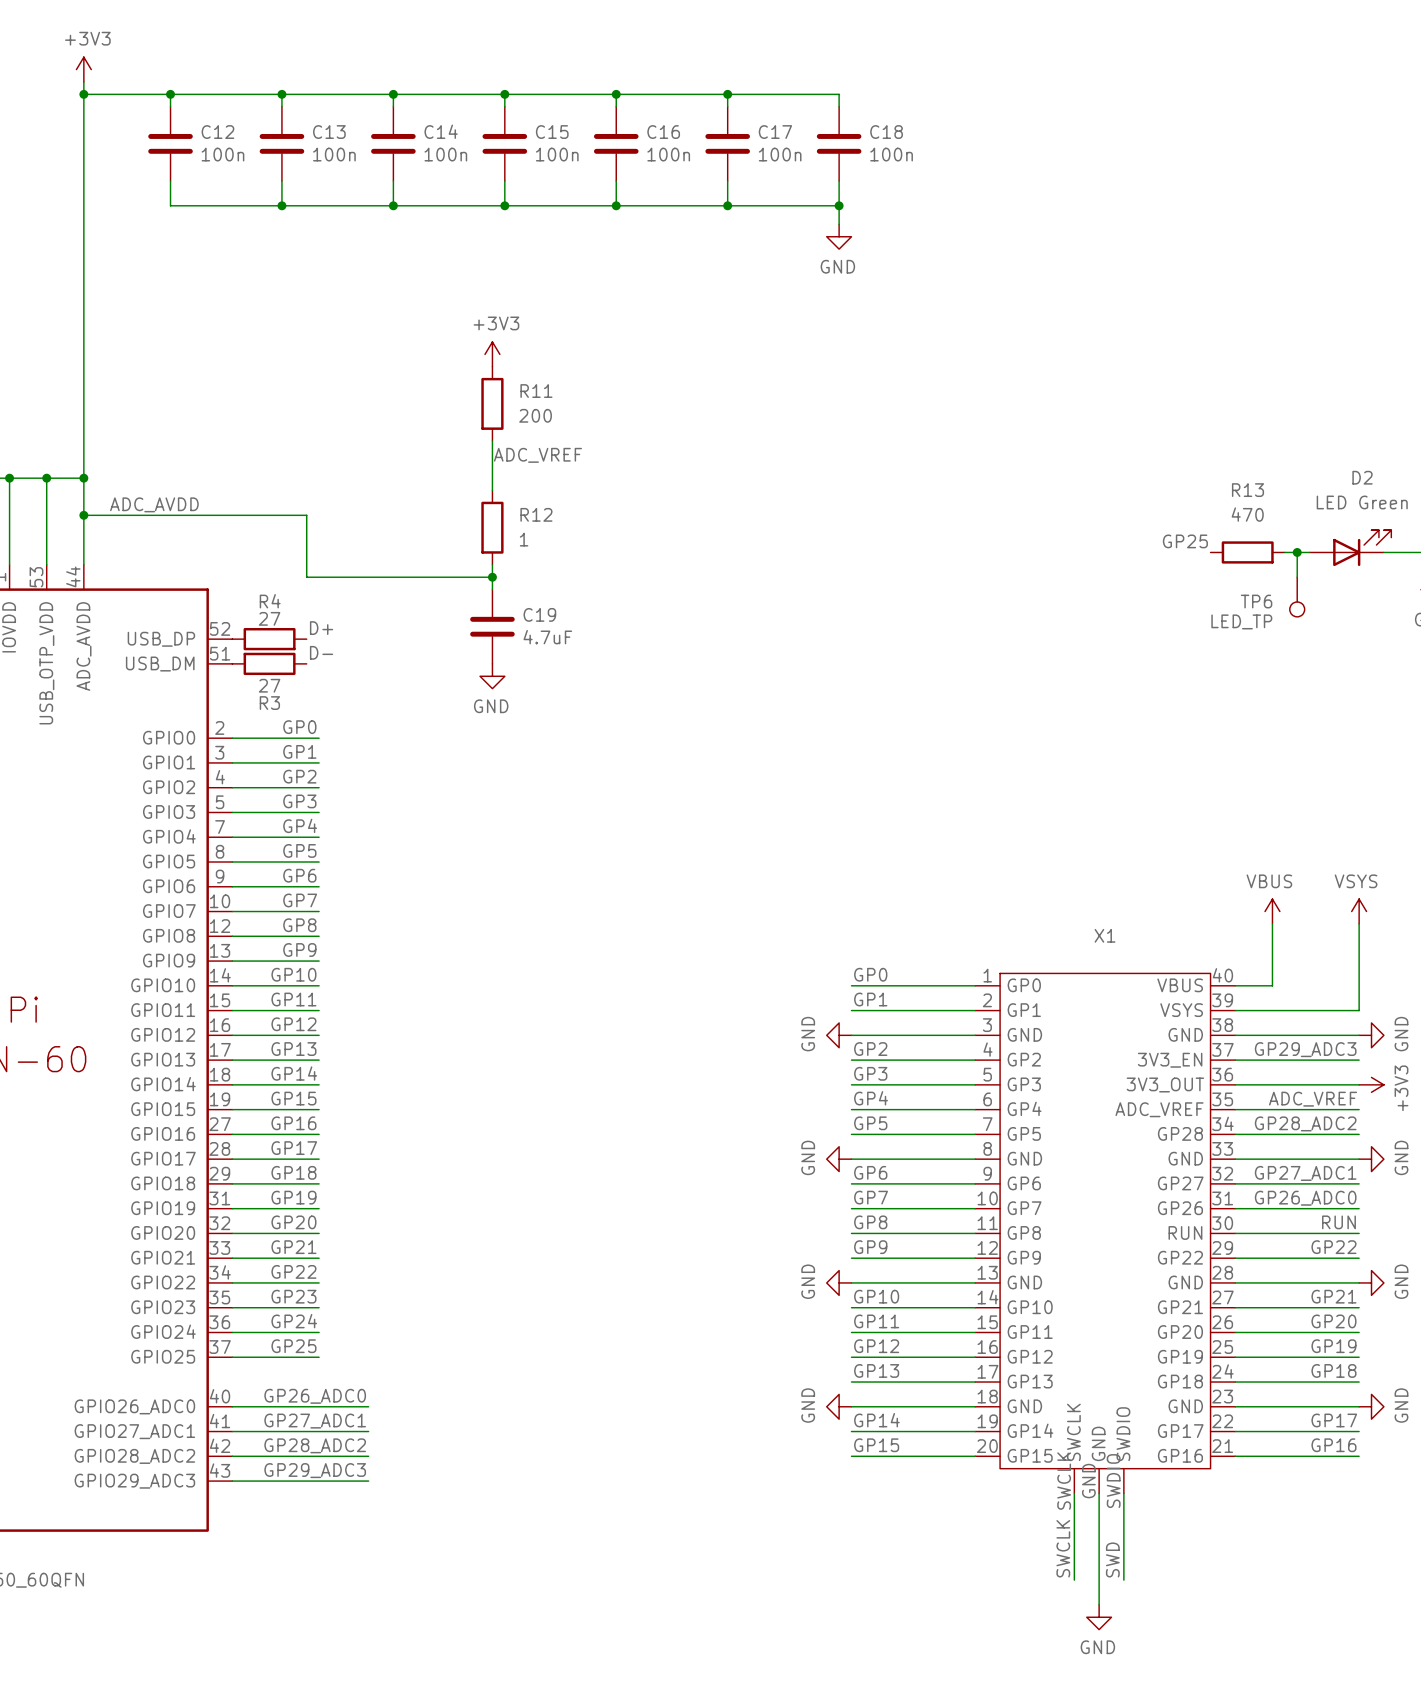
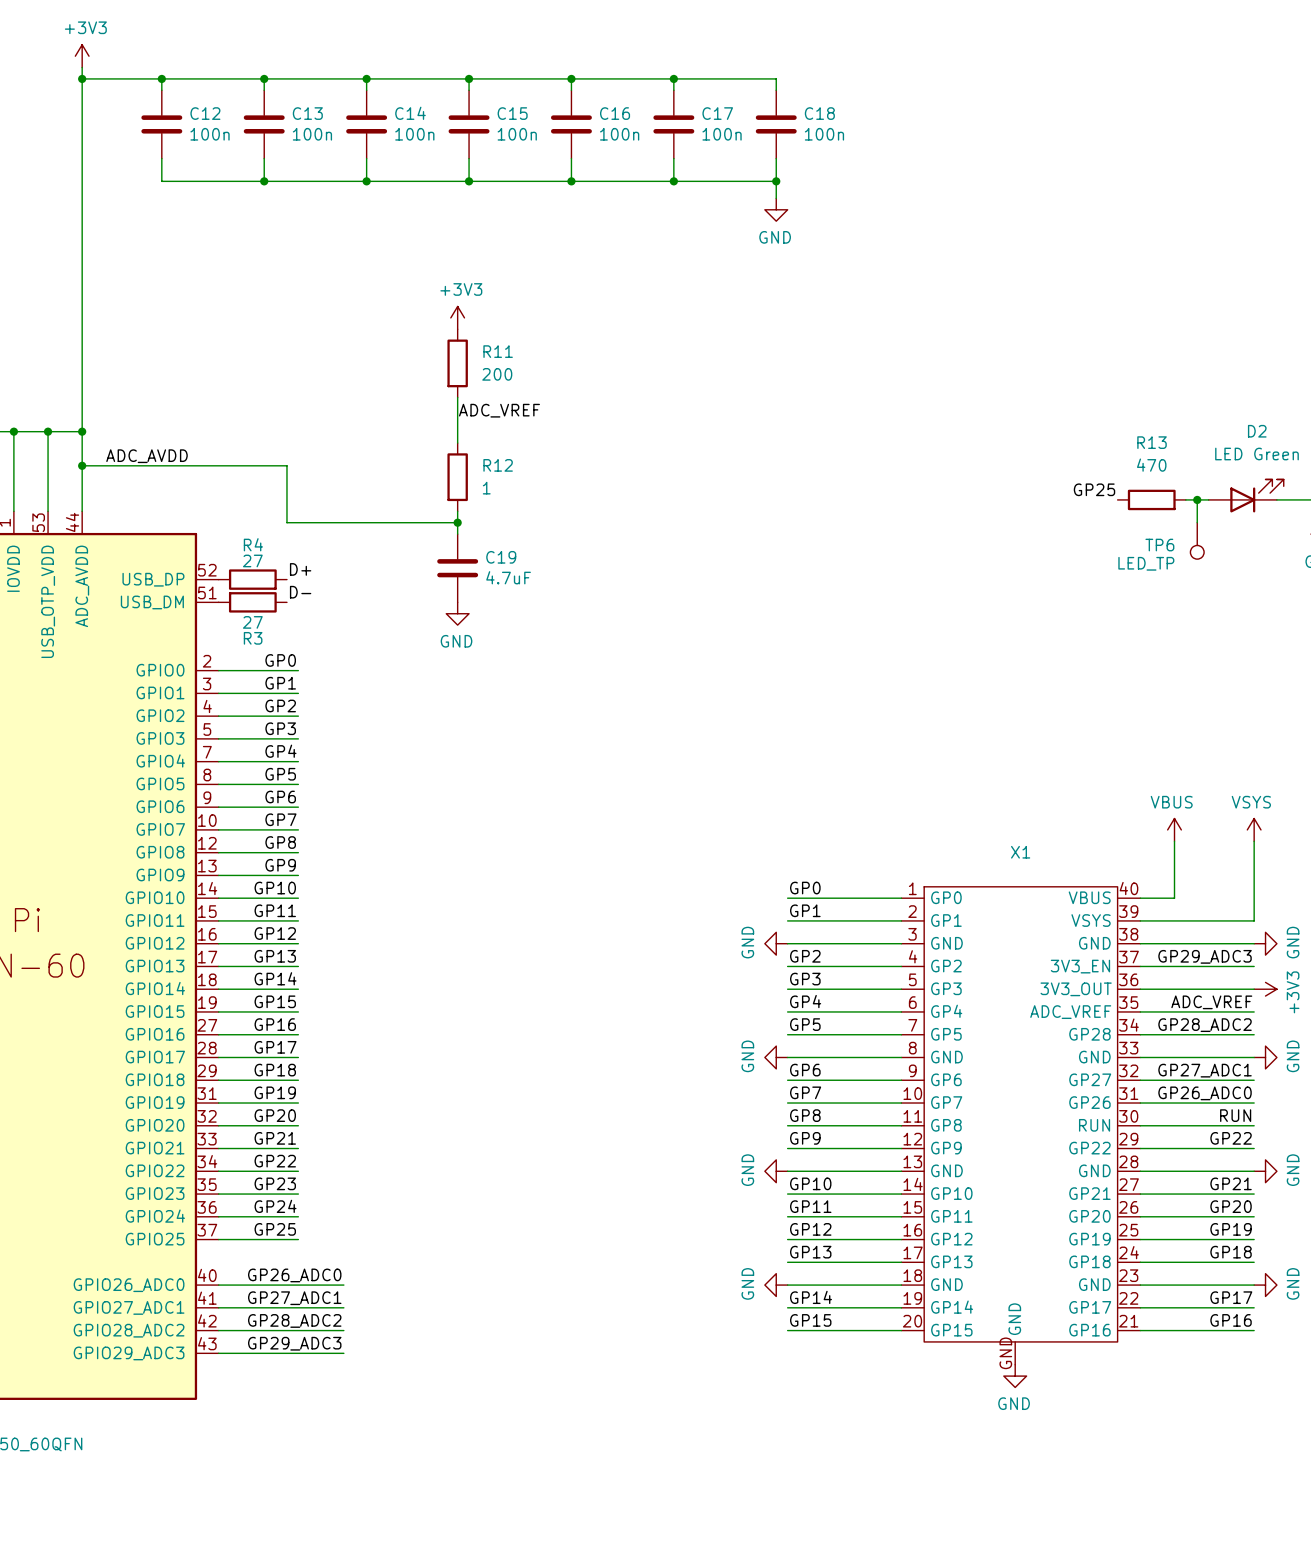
X1 symbol: [975, 973, 1236, 1494] -> [901, 886, 1141, 1365]
wire: (1074, 1493) (1074, 1580) -> none
wire: (1099, 1493) (1099, 1604) -> none
wire: (1123, 1493) (1123, 1580) -> none
label: SWCLK (1063, 1548) -> none
label: SWD (1112, 1559) -> none
power symbol position: GND (1099, 1617) -> GND (1015, 1376)

